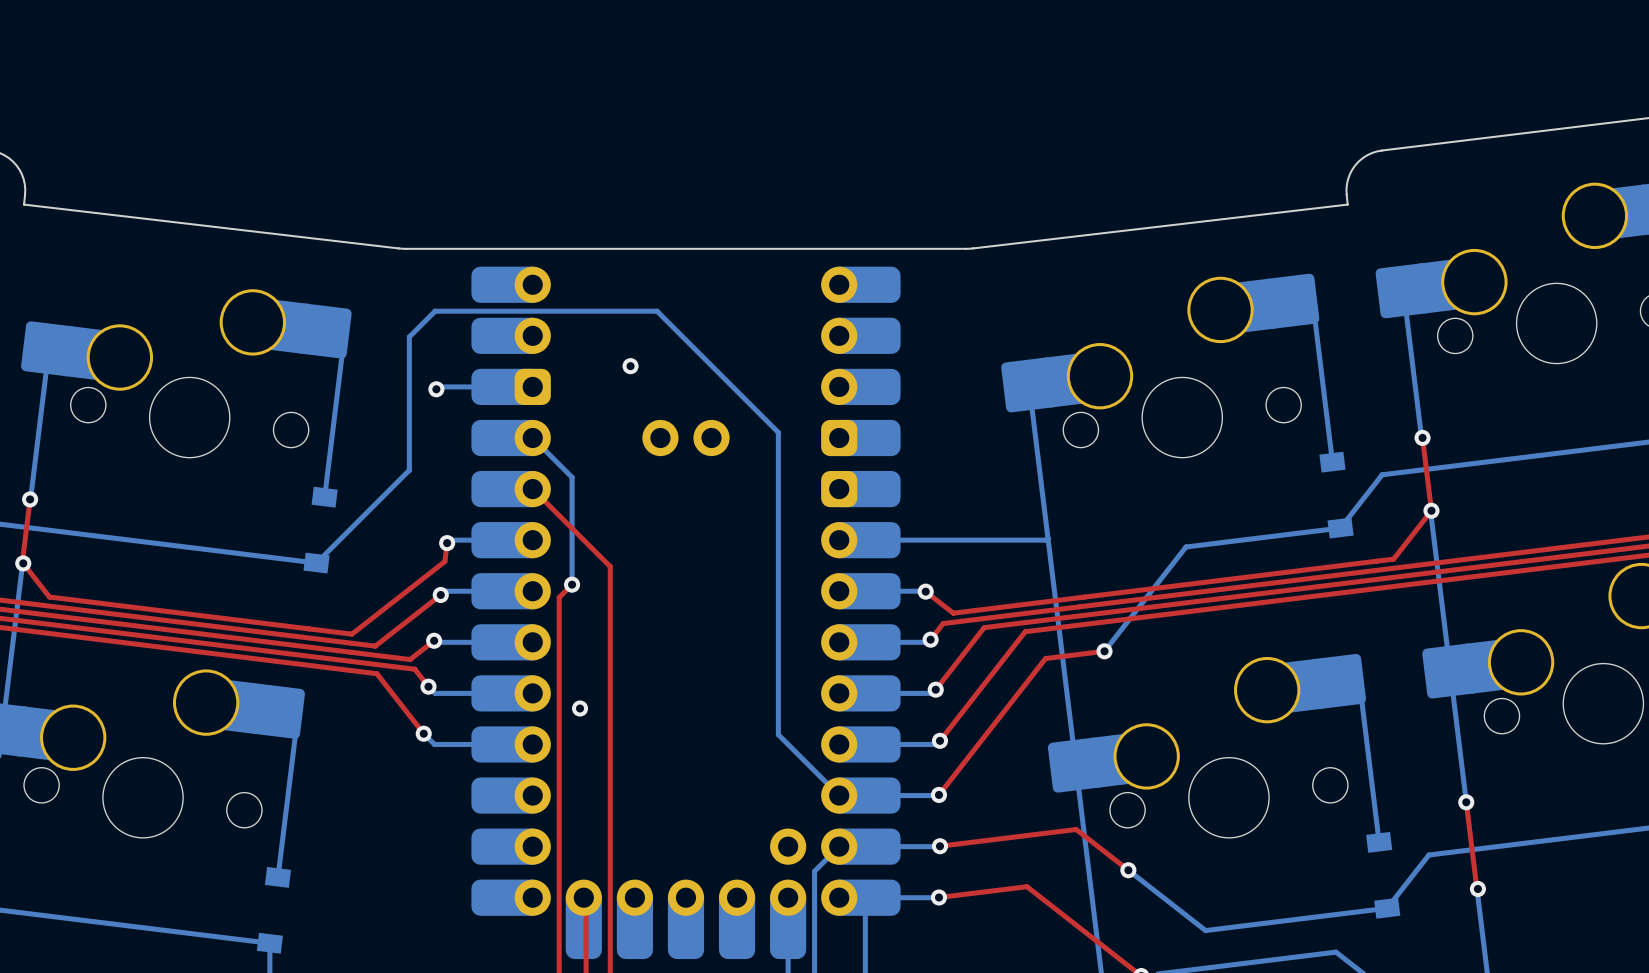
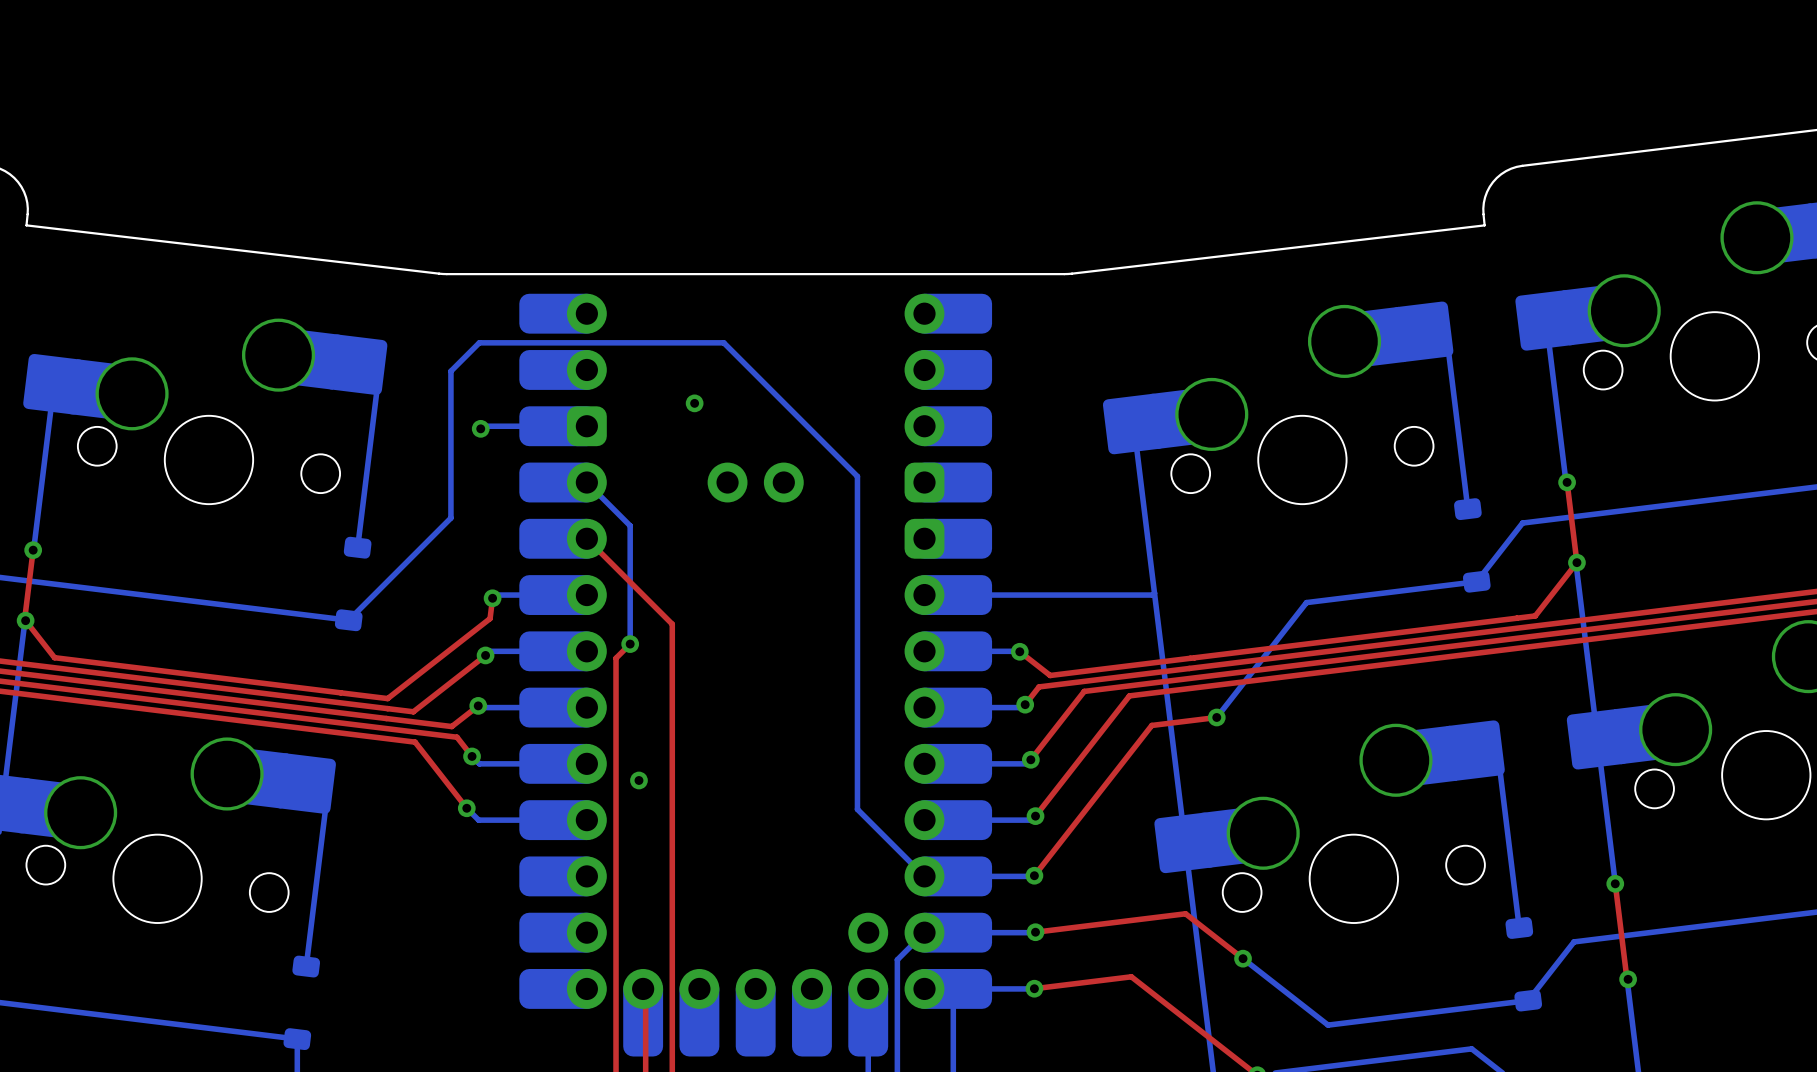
part footprint: [1319, 451, 1354, 539] -> [1454, 498, 1491, 593]
part footprint: [303, 486, 338, 574] -> [334, 536, 372, 632]
part footprint: [1366, 831, 1401, 919] -> [1505, 917, 1543, 1012]
part footprint: [256, 866, 292, 954] -> [283, 955, 321, 1051]

